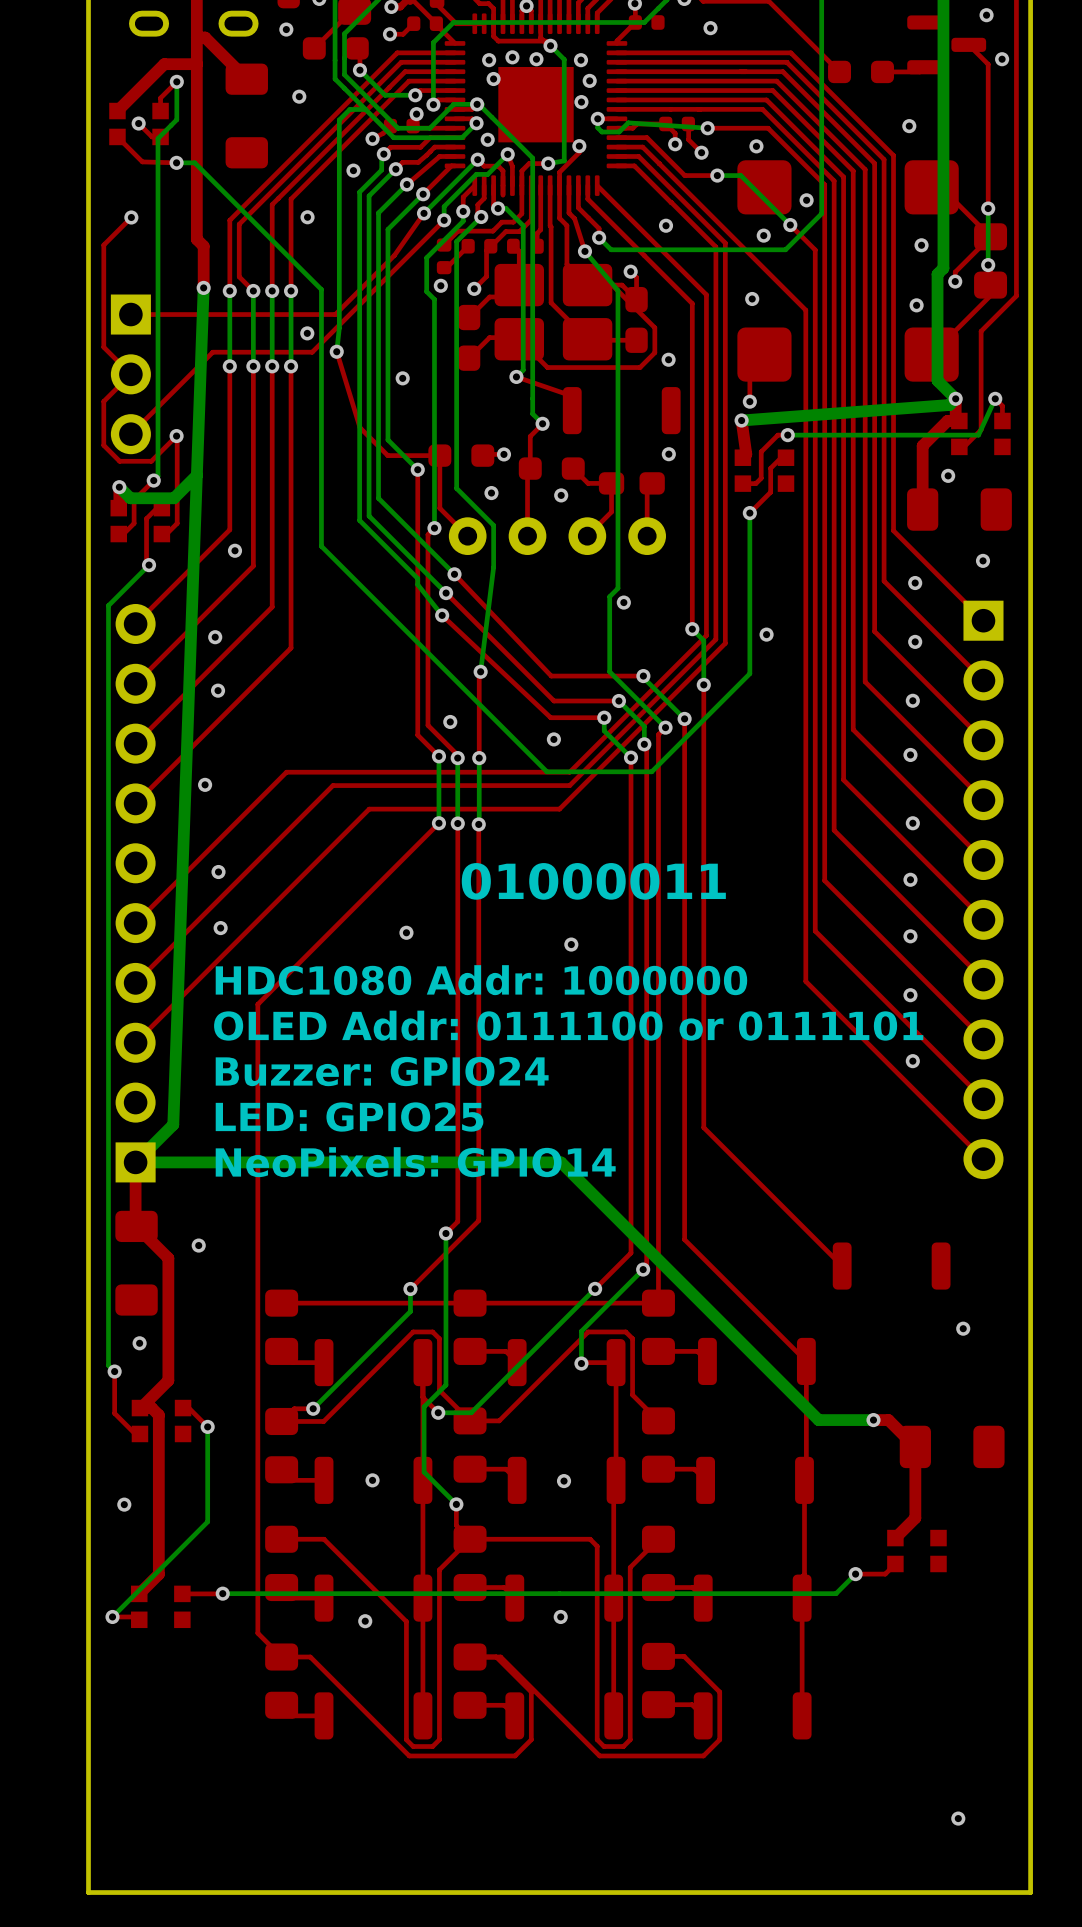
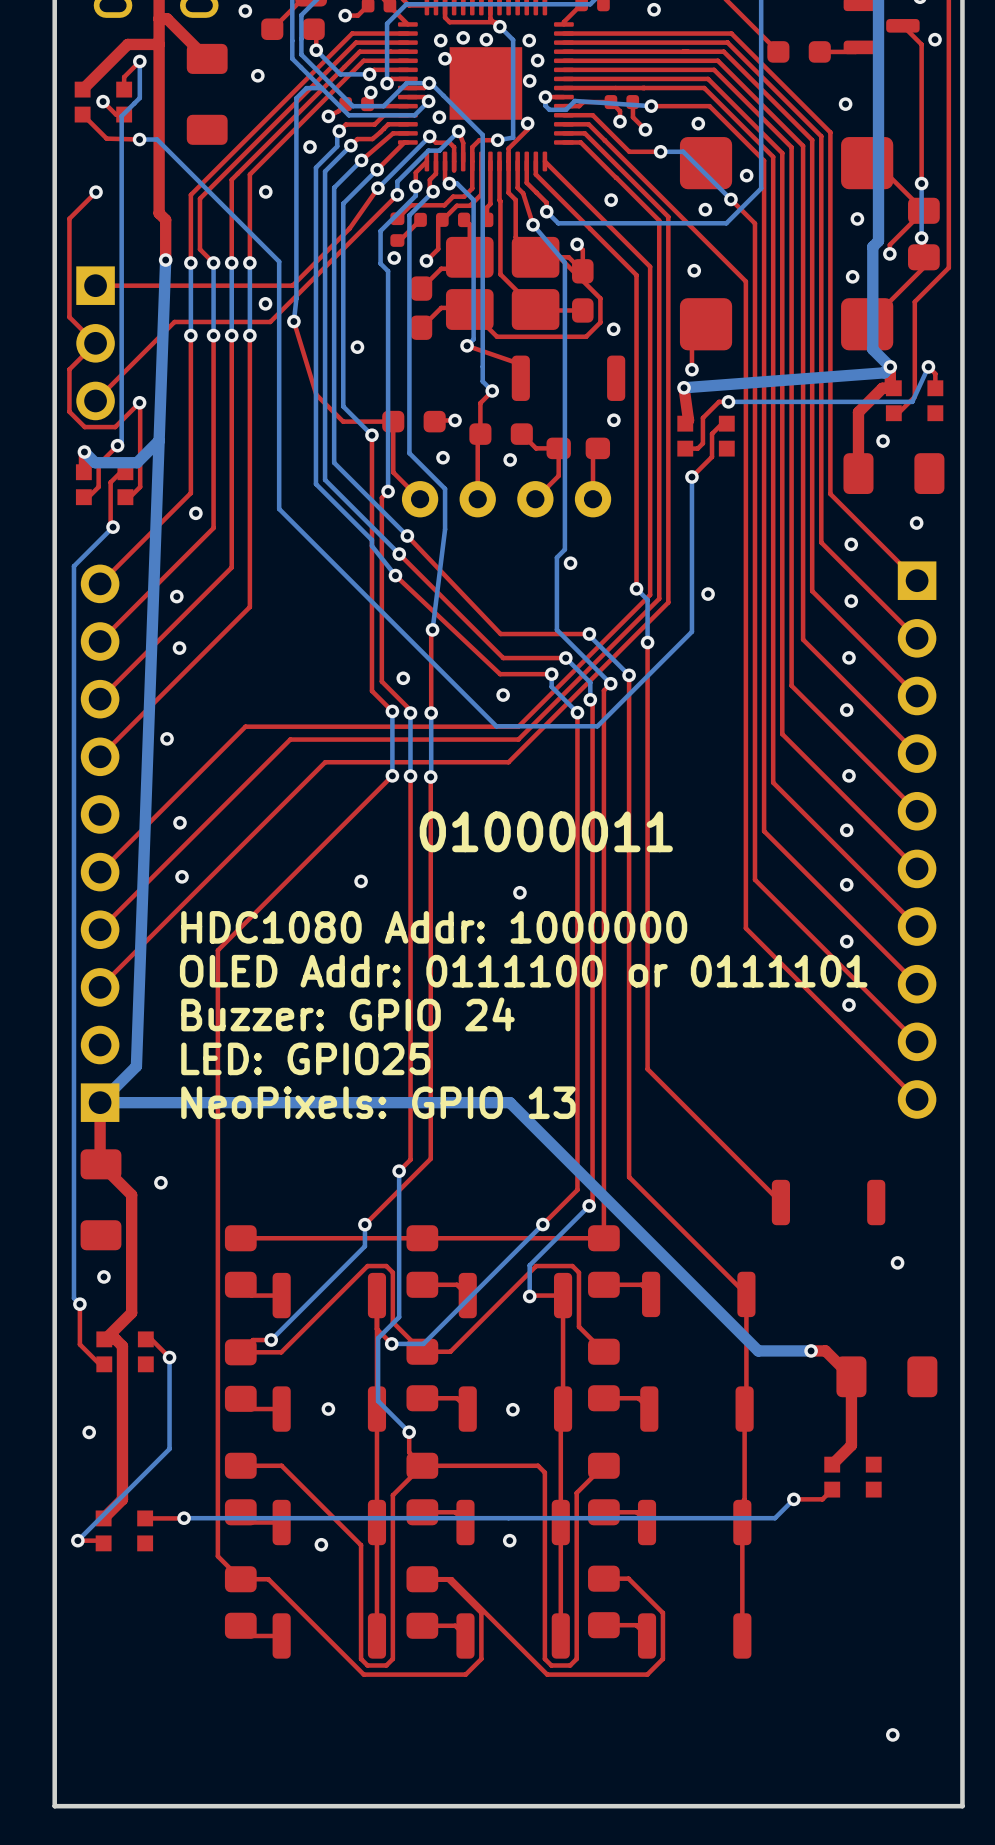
text: Buzzer: GPIO24 (382, 1071) -> Buzzer: GPIO 24 (347, 1014)
text: NeoPixels: GPIO14 (415, 1162) -> NeoPixels: GPIO 13 (378, 1102)

